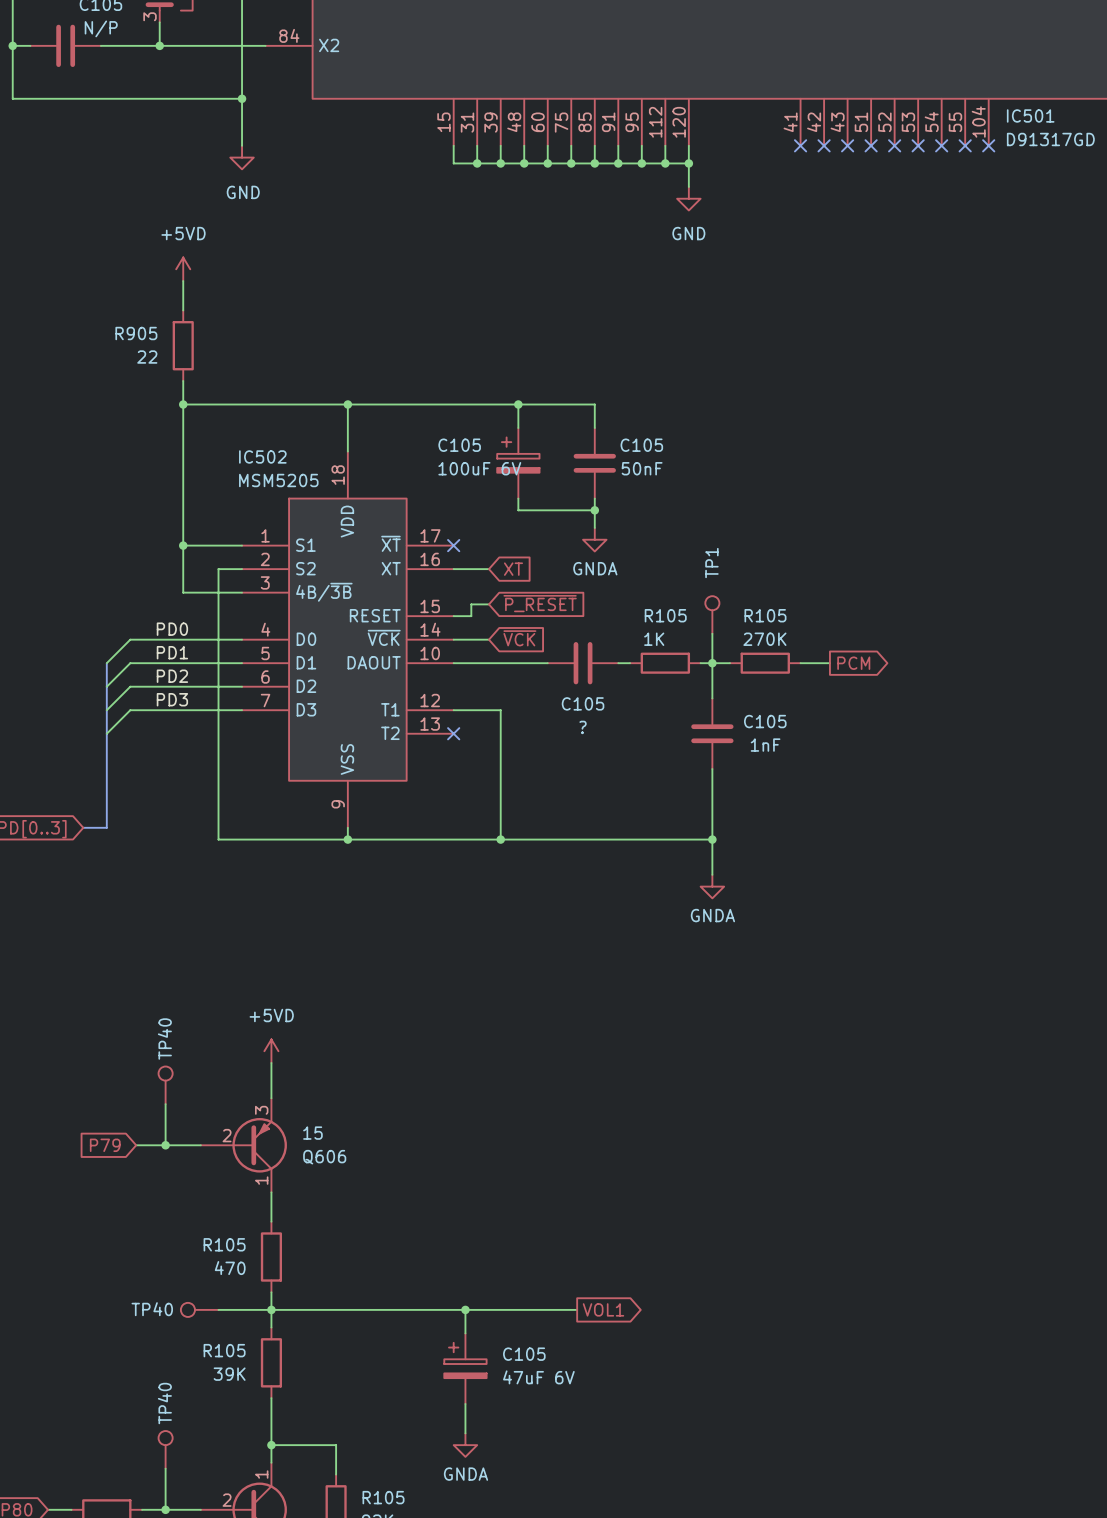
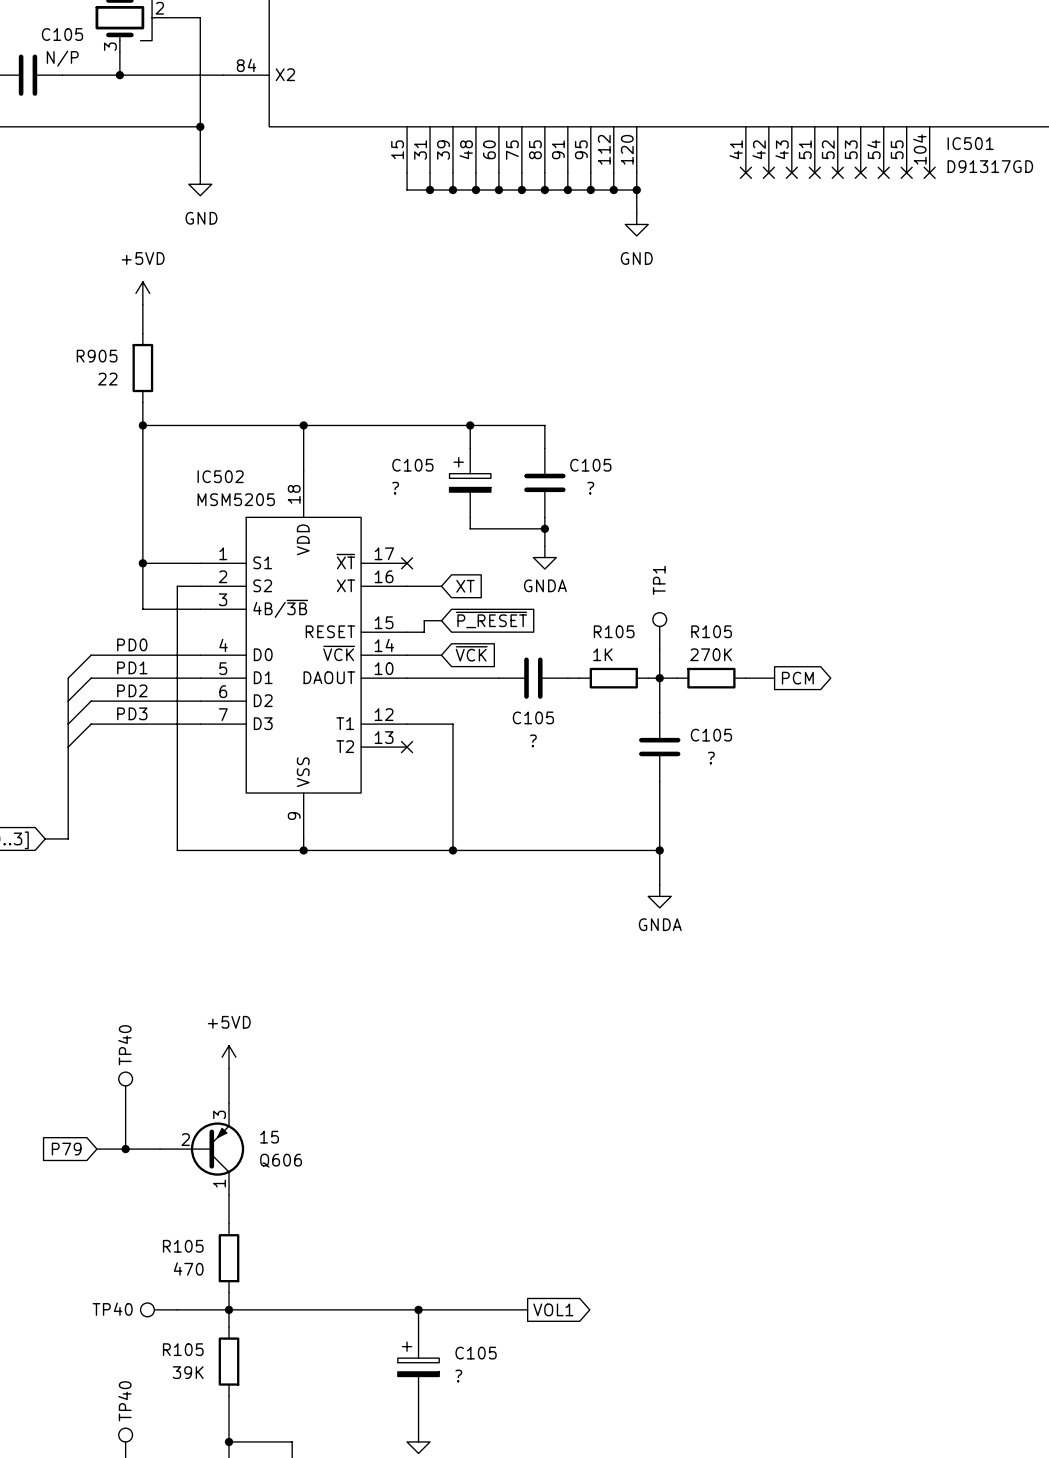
C105 value: 100uF 6V (479, 468) -> ? (395, 488)
C105 value: 50nF (642, 468) -> ? (590, 488)
C105 value: 1nF (765, 745) -> ? (711, 758)
C105 value: 47uF 6V (538, 1377) -> ? (458, 1376)

